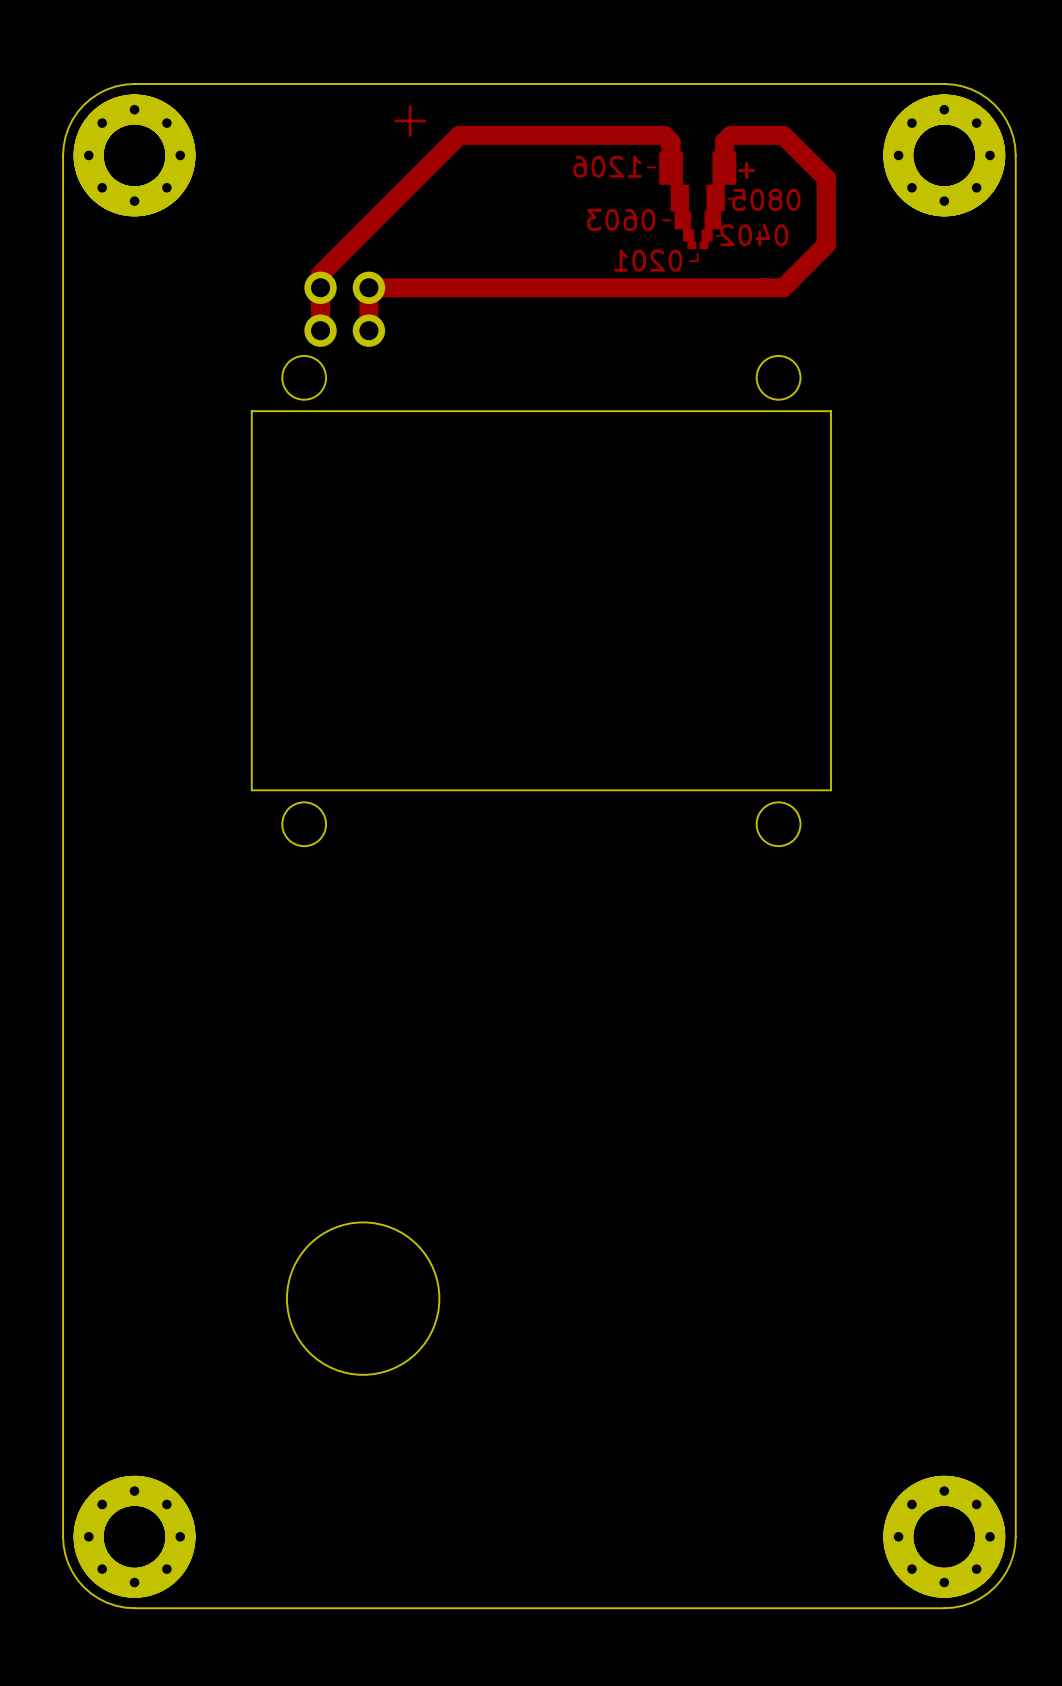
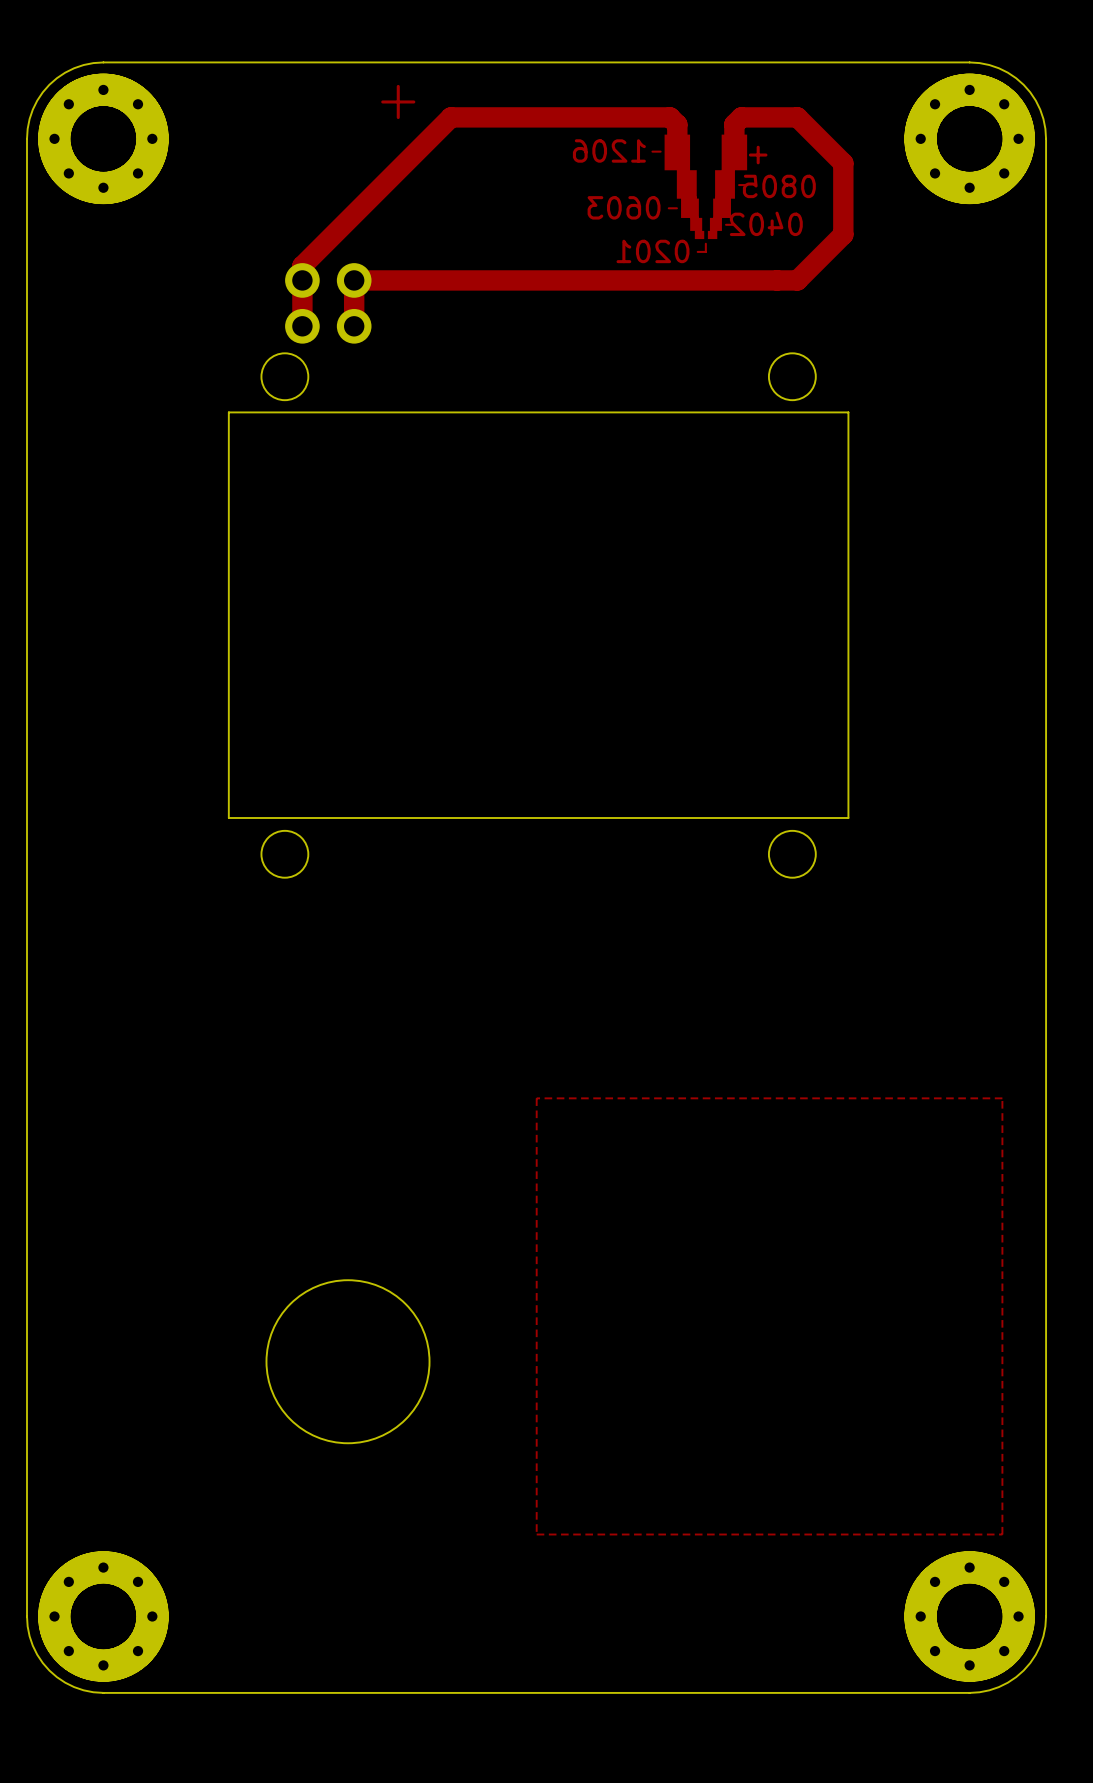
top zone outline: none -> (1002, 1098) (536, 1098) (536, 1534) (1002, 1534) (1002, 1098)

